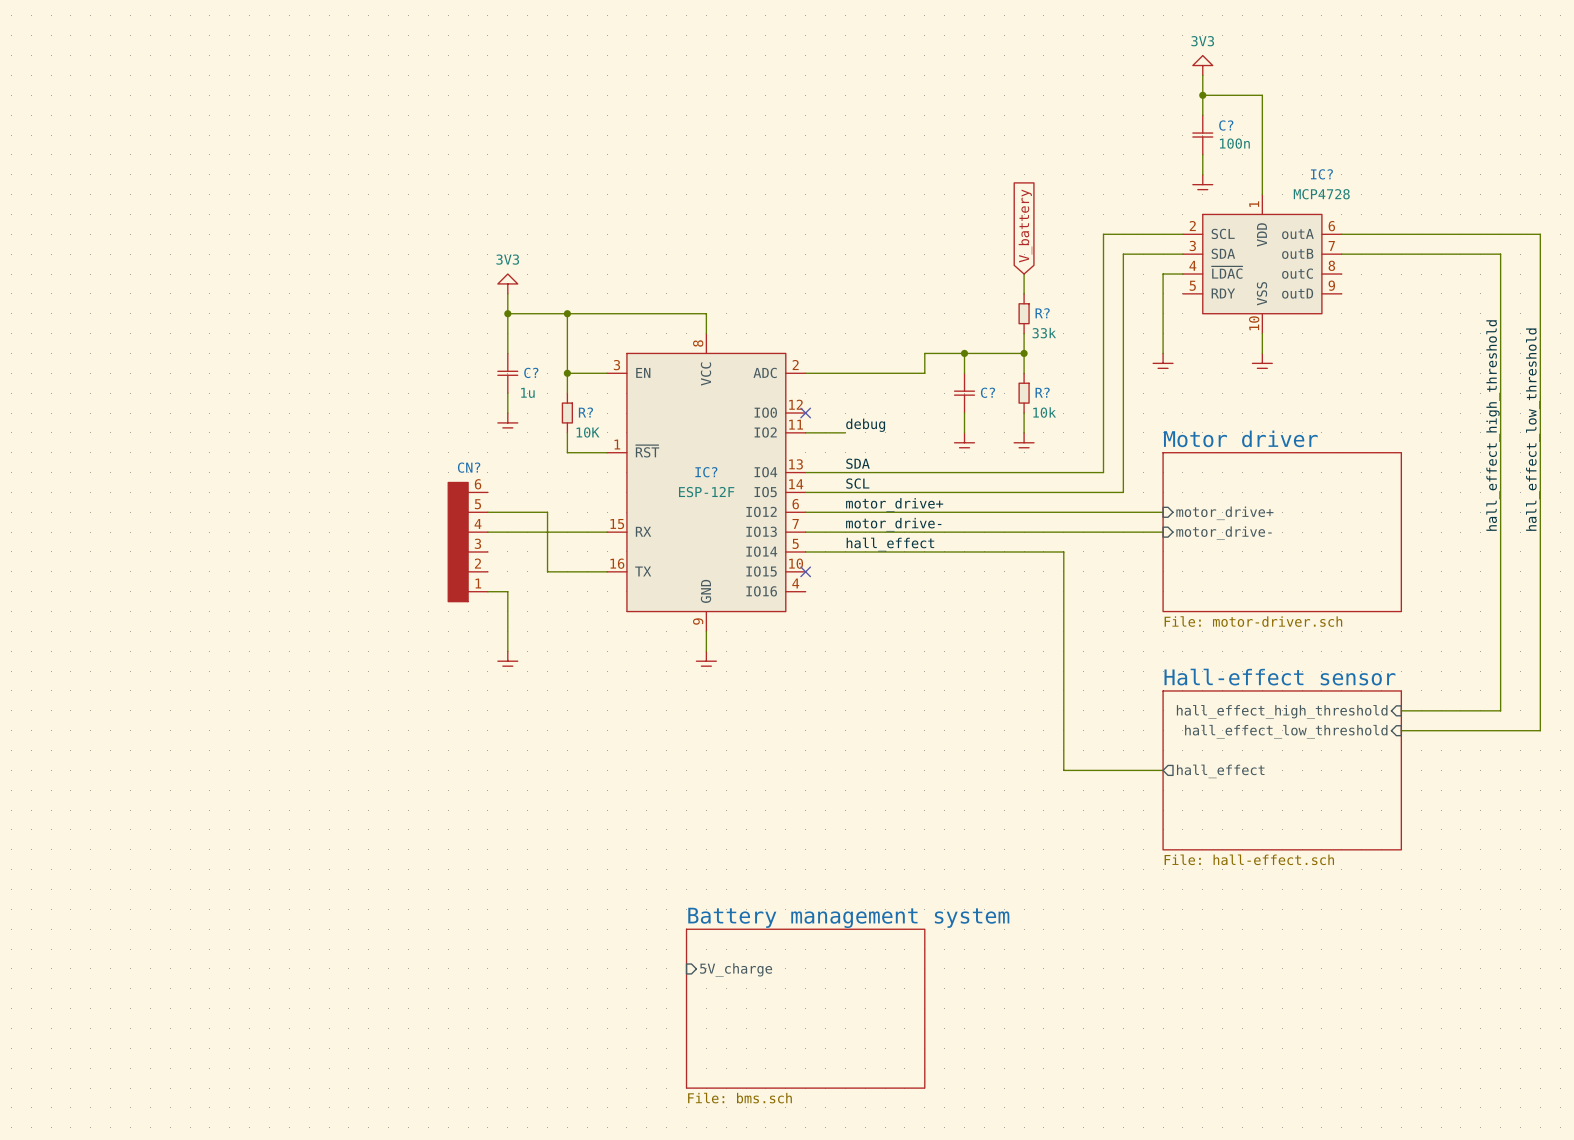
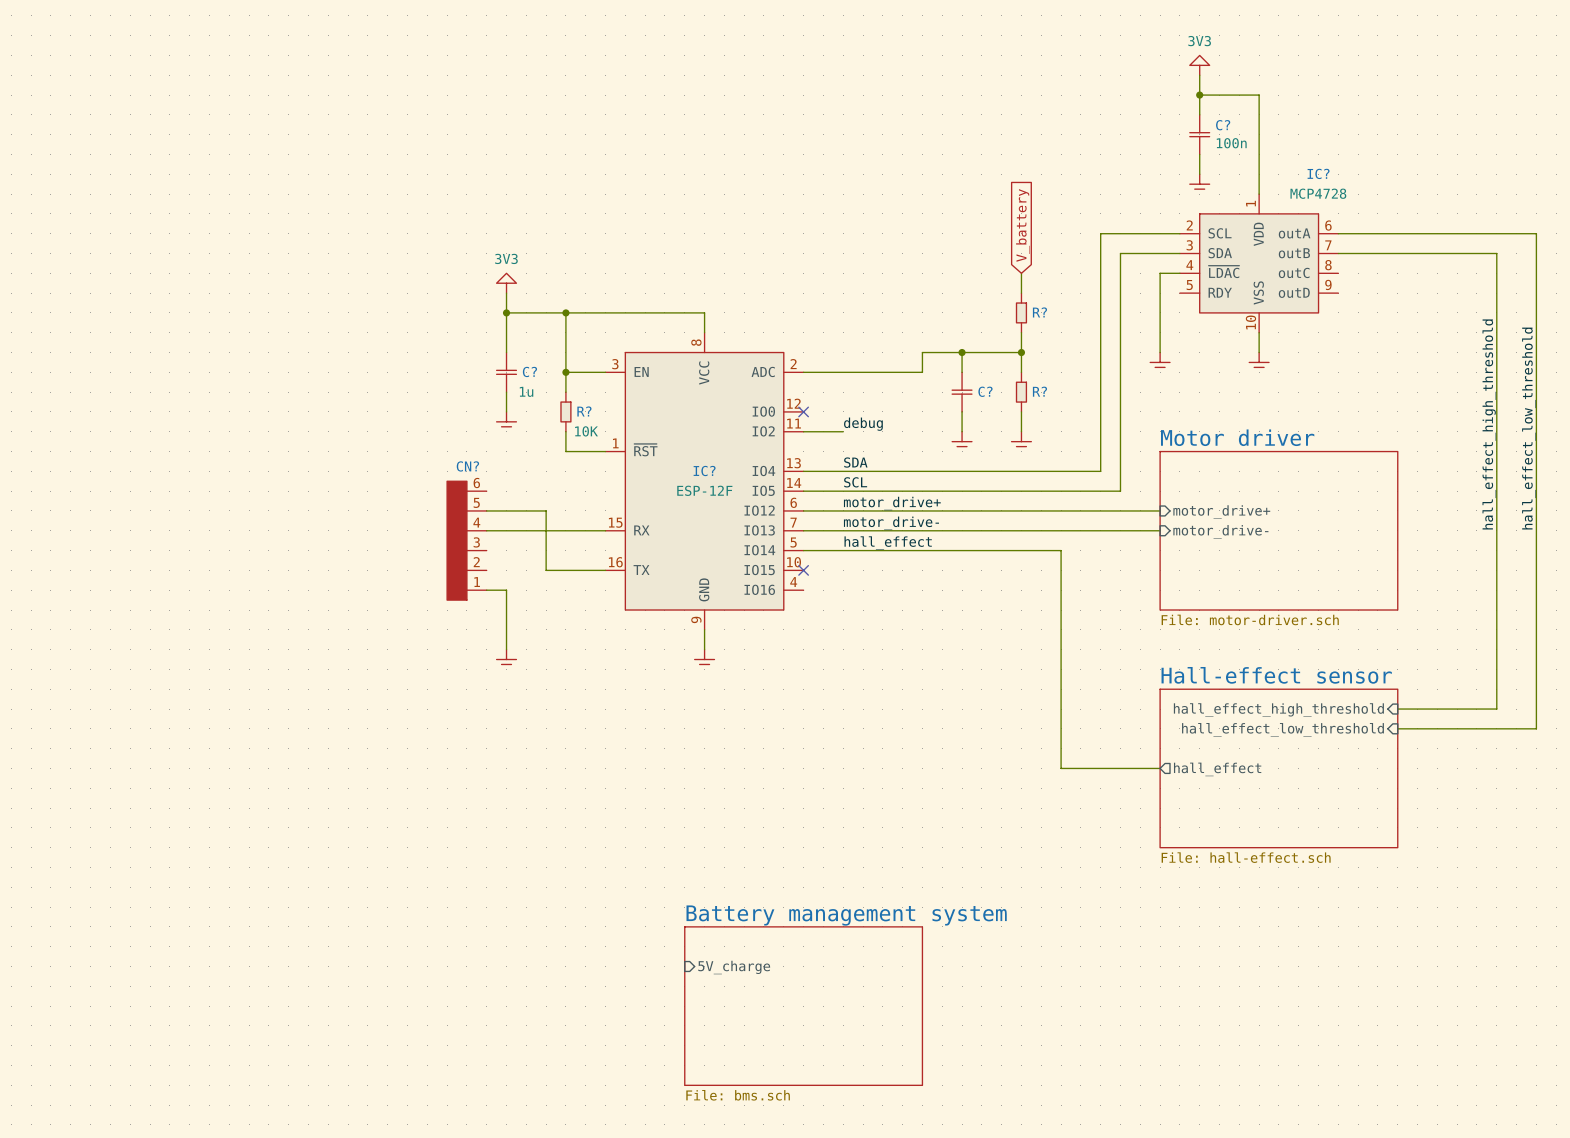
R? value: 33k (1044, 333) -> none
R? value: 10k (1044, 412) -> none

